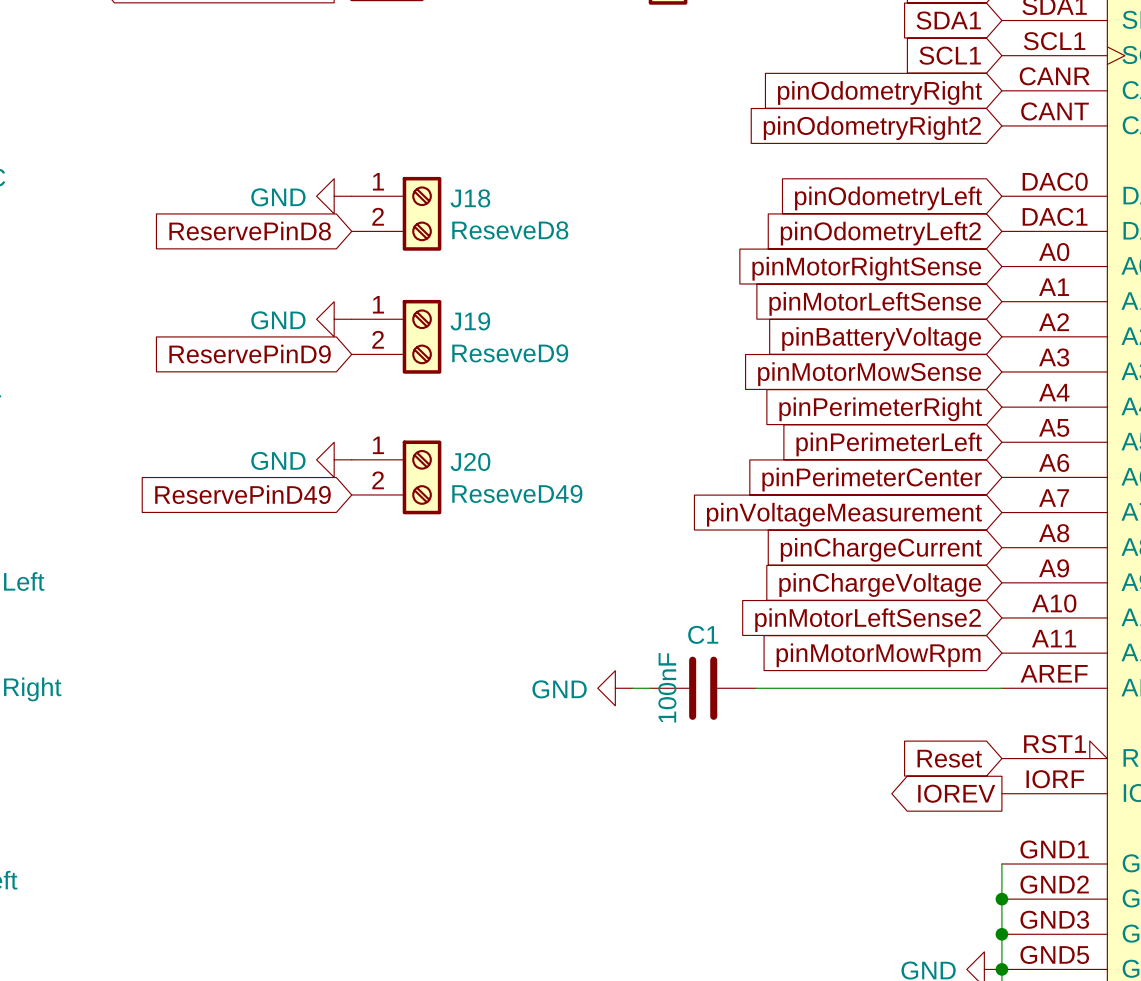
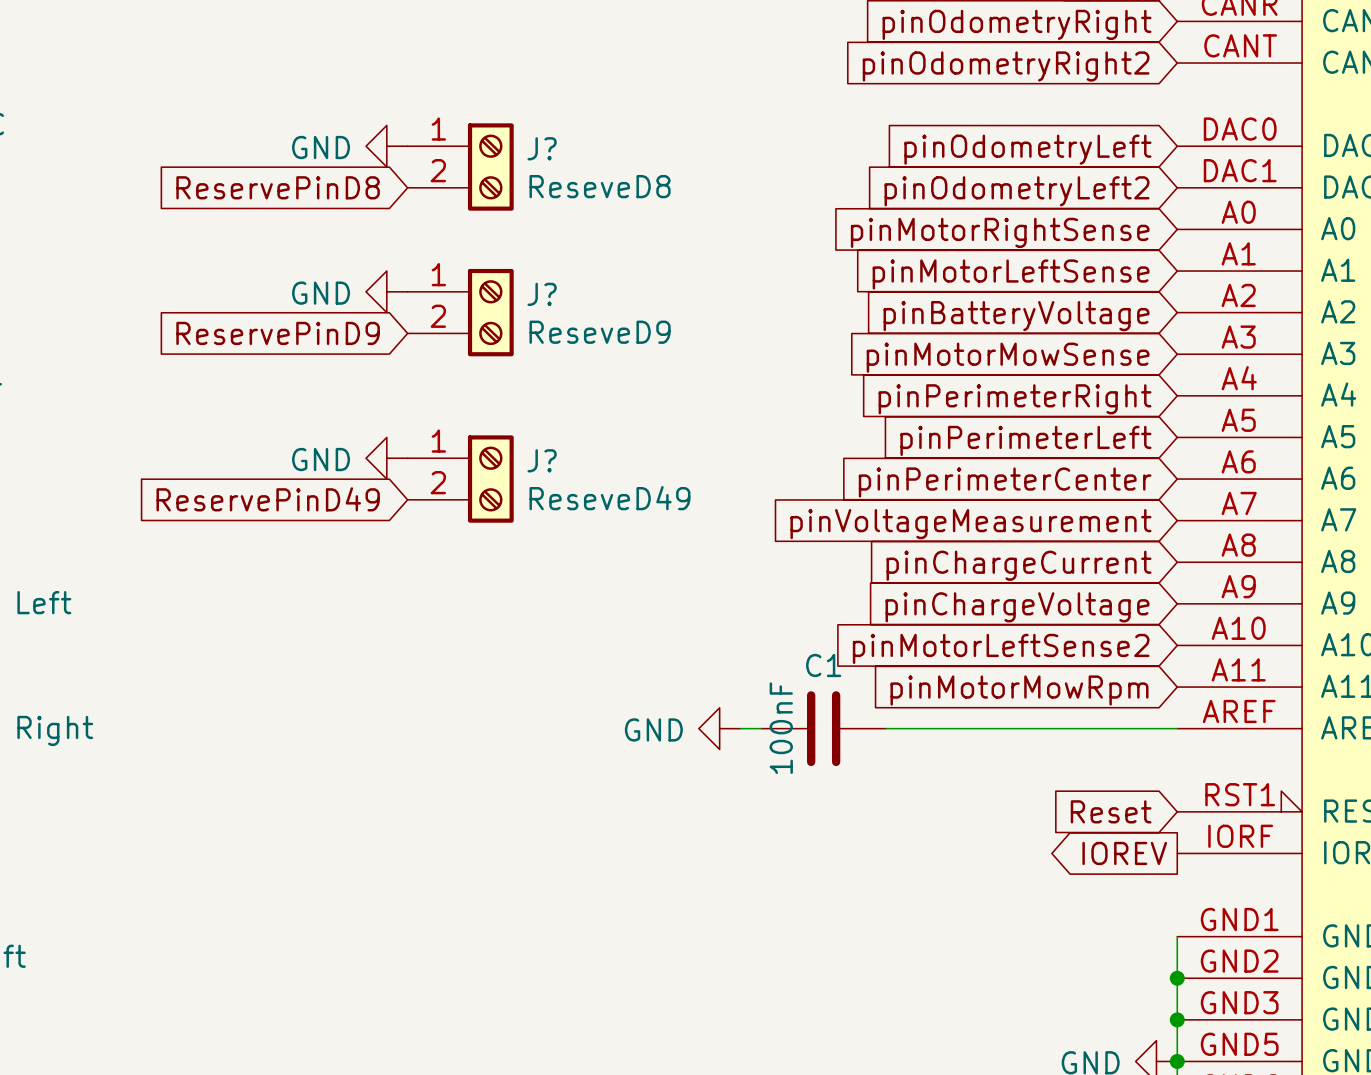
J18 name: J18 (470, 198) -> J? (542, 148)
J19 name: J19 (470, 321) -> J? (542, 294)
J20 name: J20 (470, 461) -> J? (542, 460)

